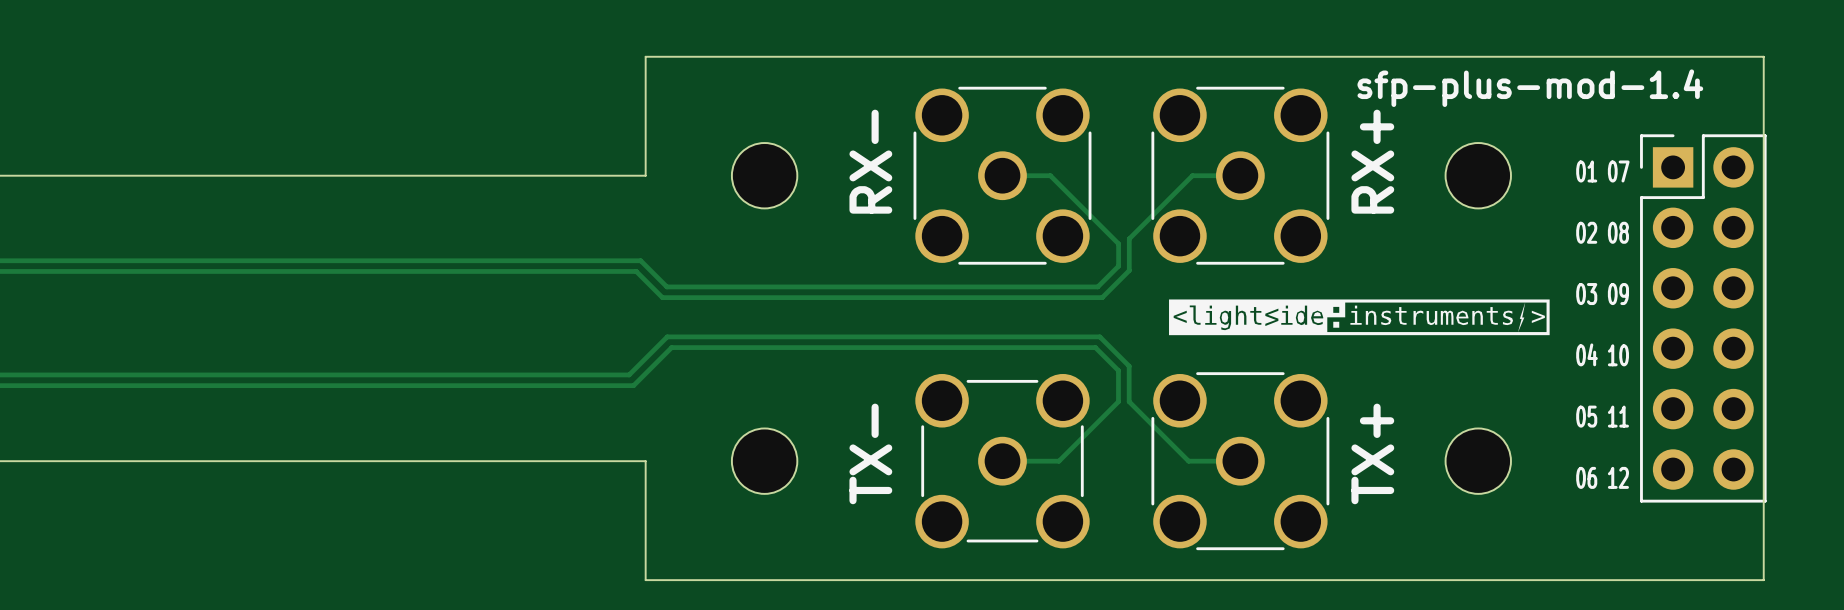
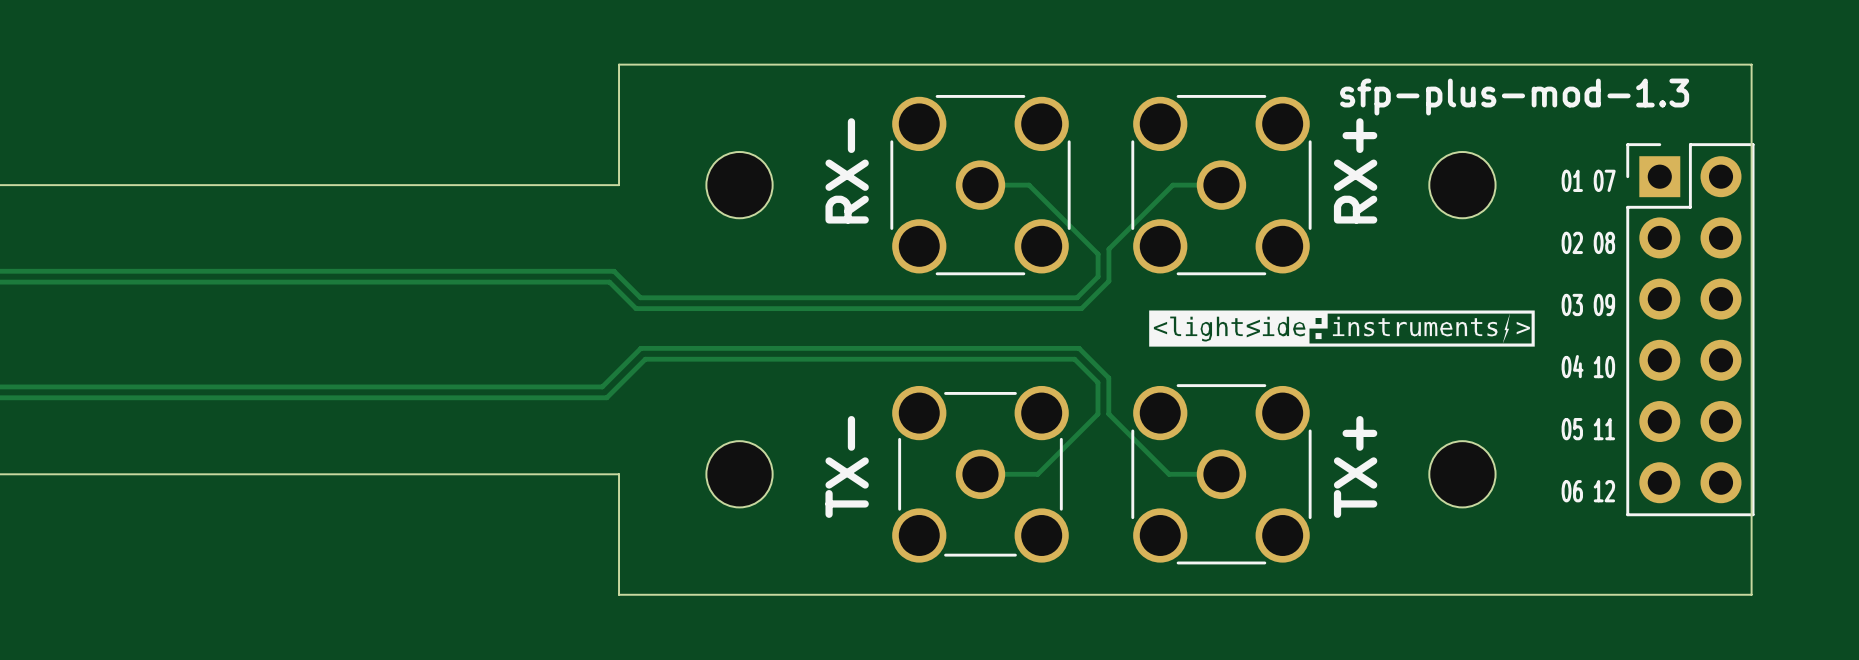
text: sfp-plus-mod-1.4 (1530, 88) -> sfp-plus-mod-1.3 (1514, 97)

